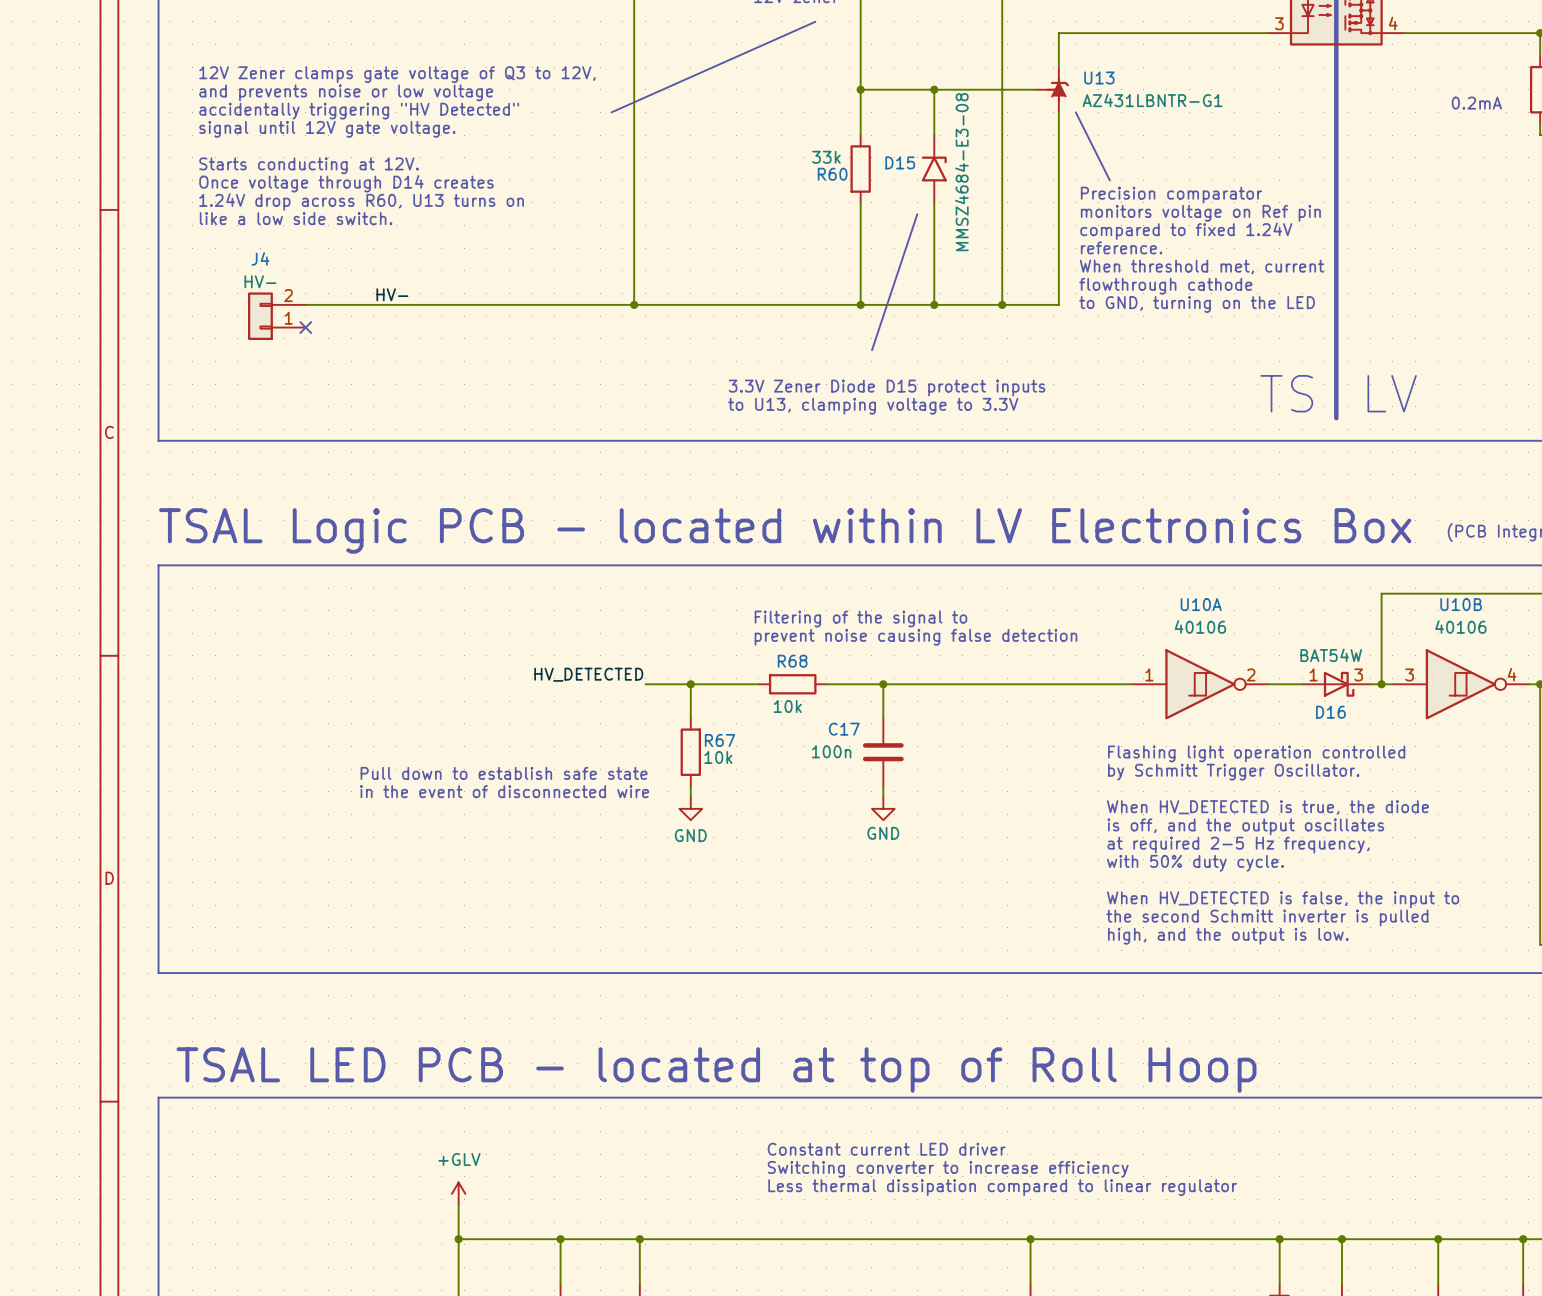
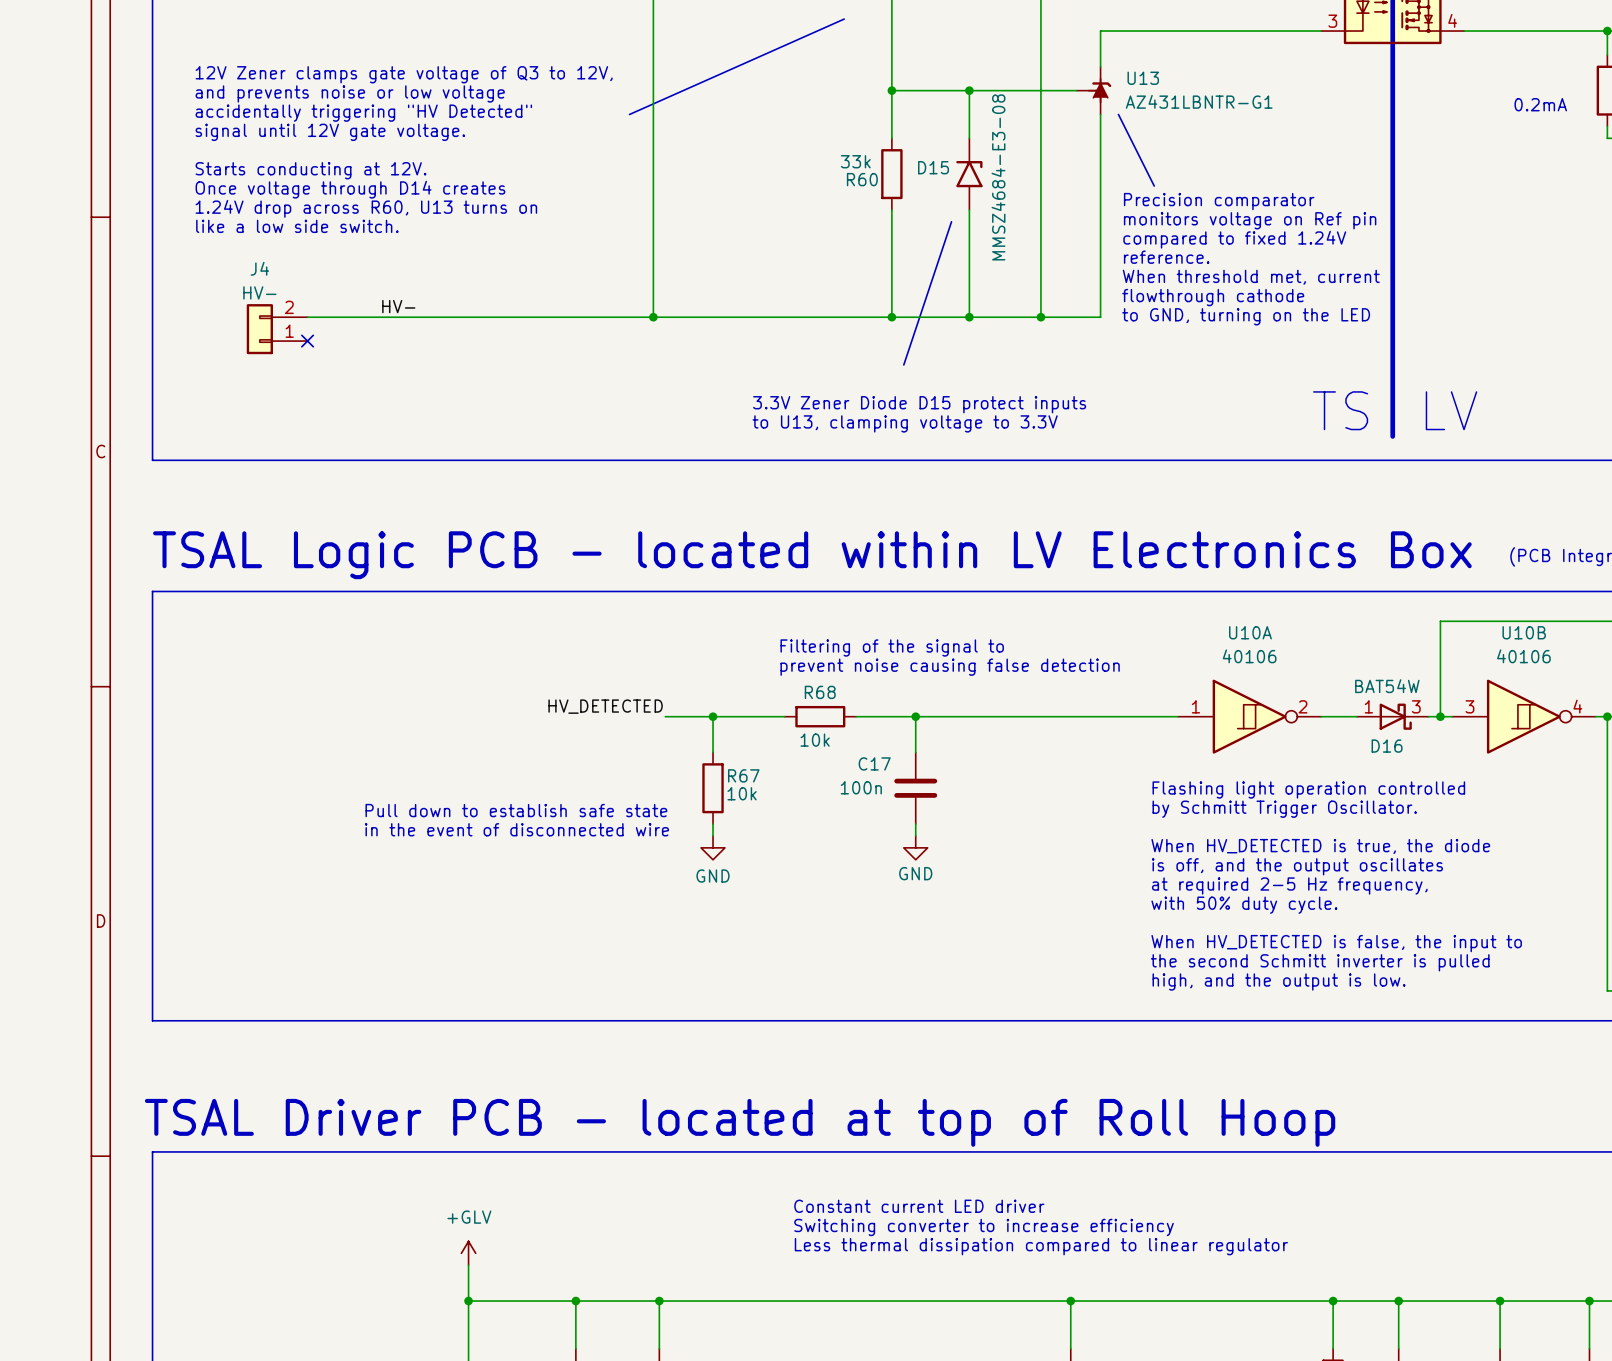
text: TSAL LED PCB - located at top of Roll Hoop (716, 1070) -> TSAL Driver PCB - located at top of Roll Hoop (740, 1122)

